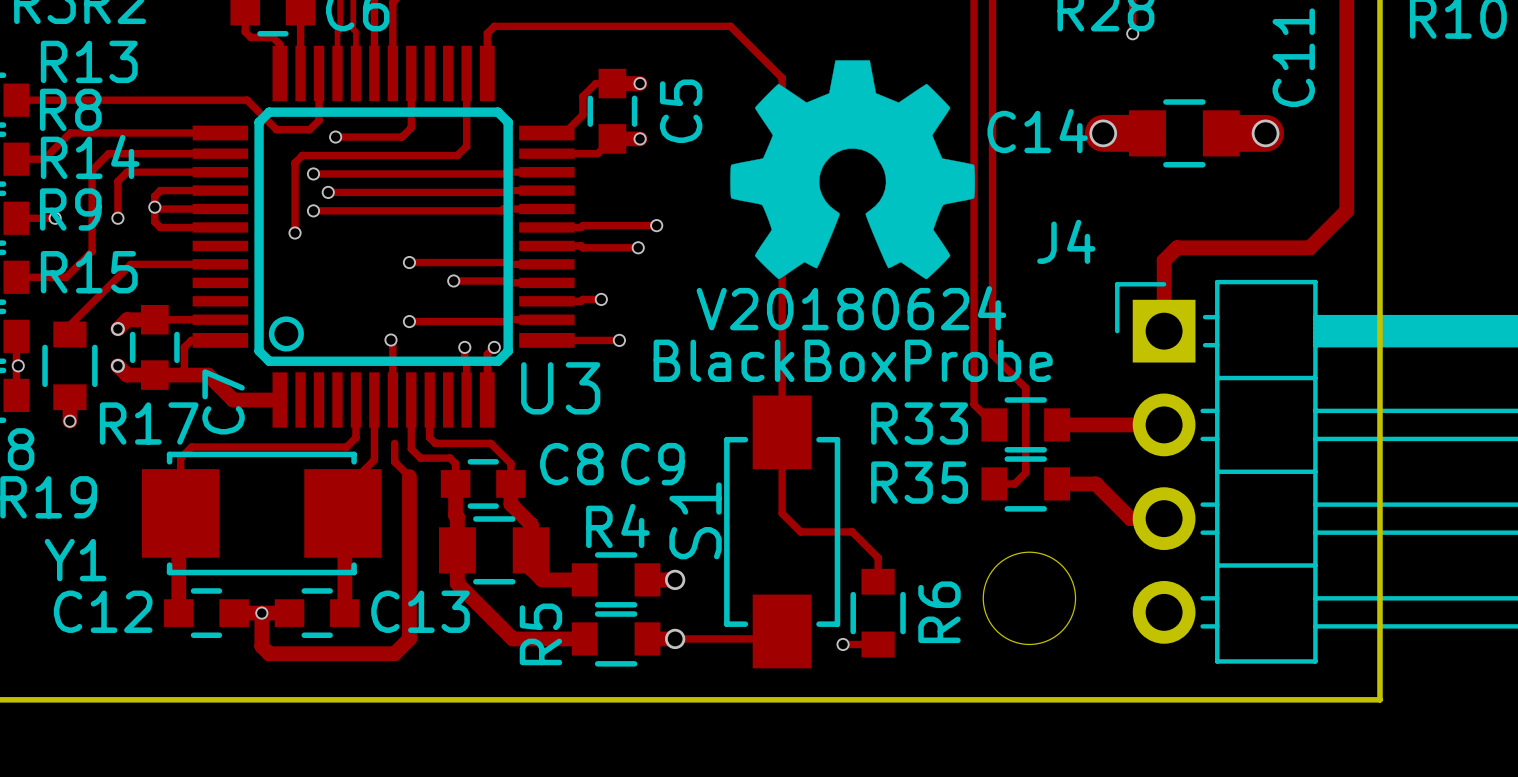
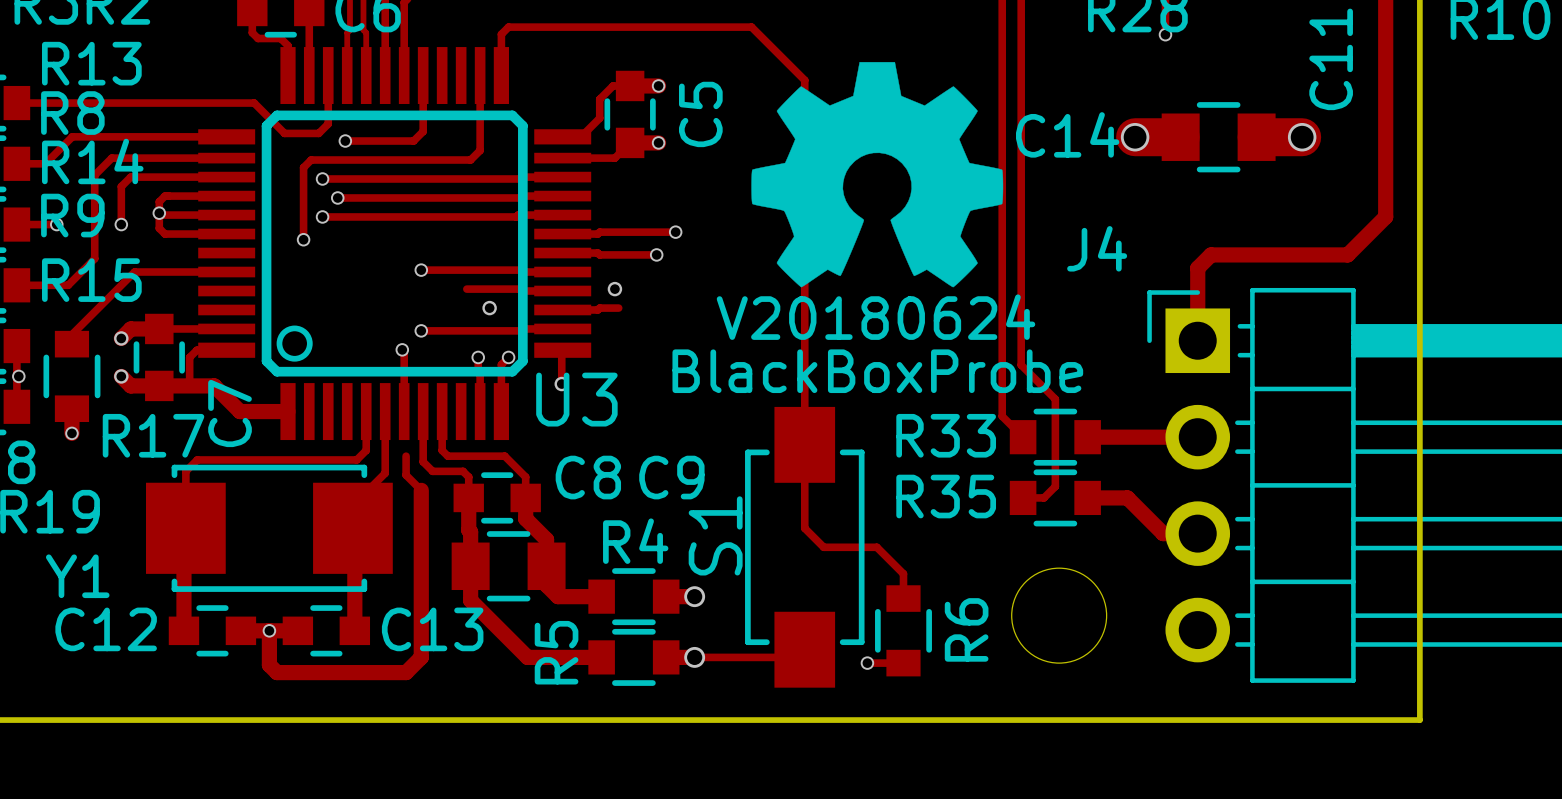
via: (453, 280) -> none
via: none -> (614, 289)
via: none -> (489, 308)
via: (601, 299) -> none
track: (546, 340) (619, 340) -> (562, 350) (561, 384)
via: (619, 340) -> none
via: none -> (561, 384)

